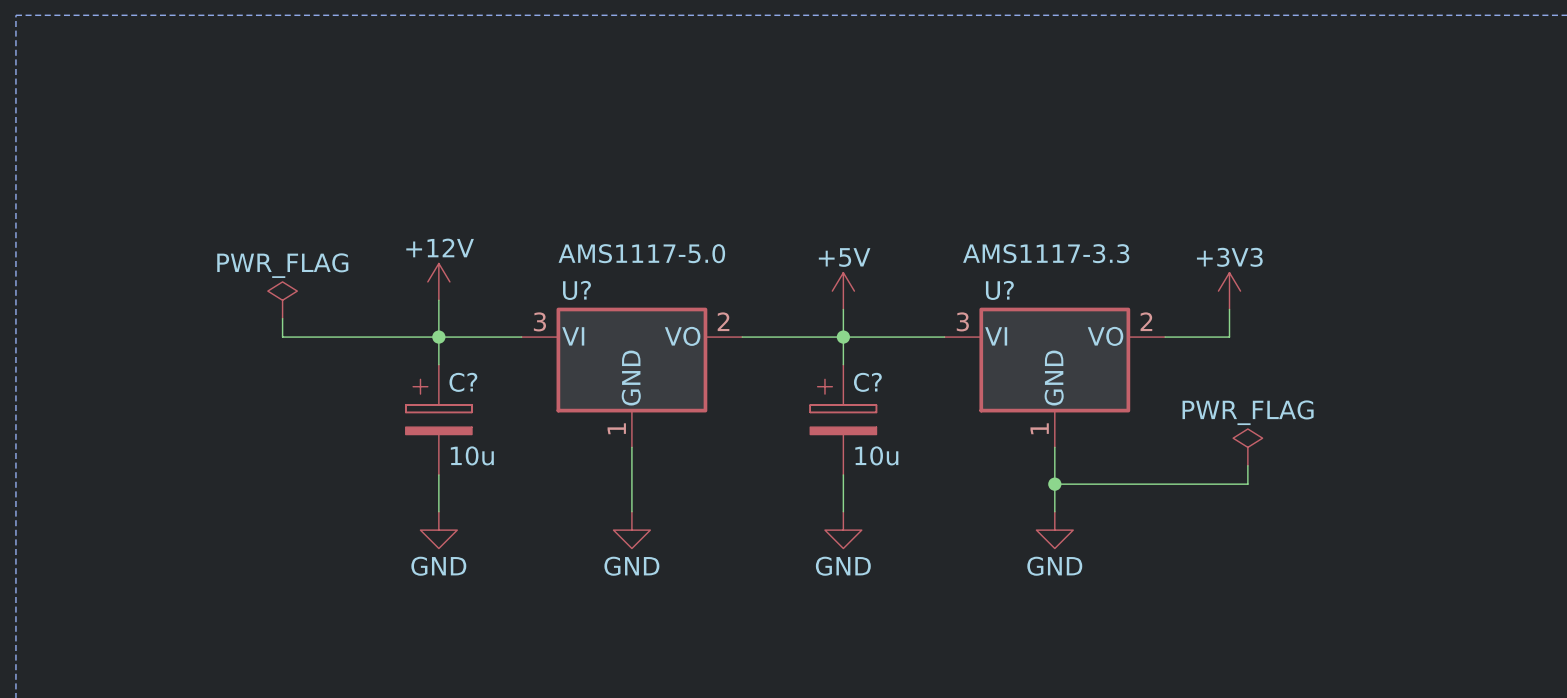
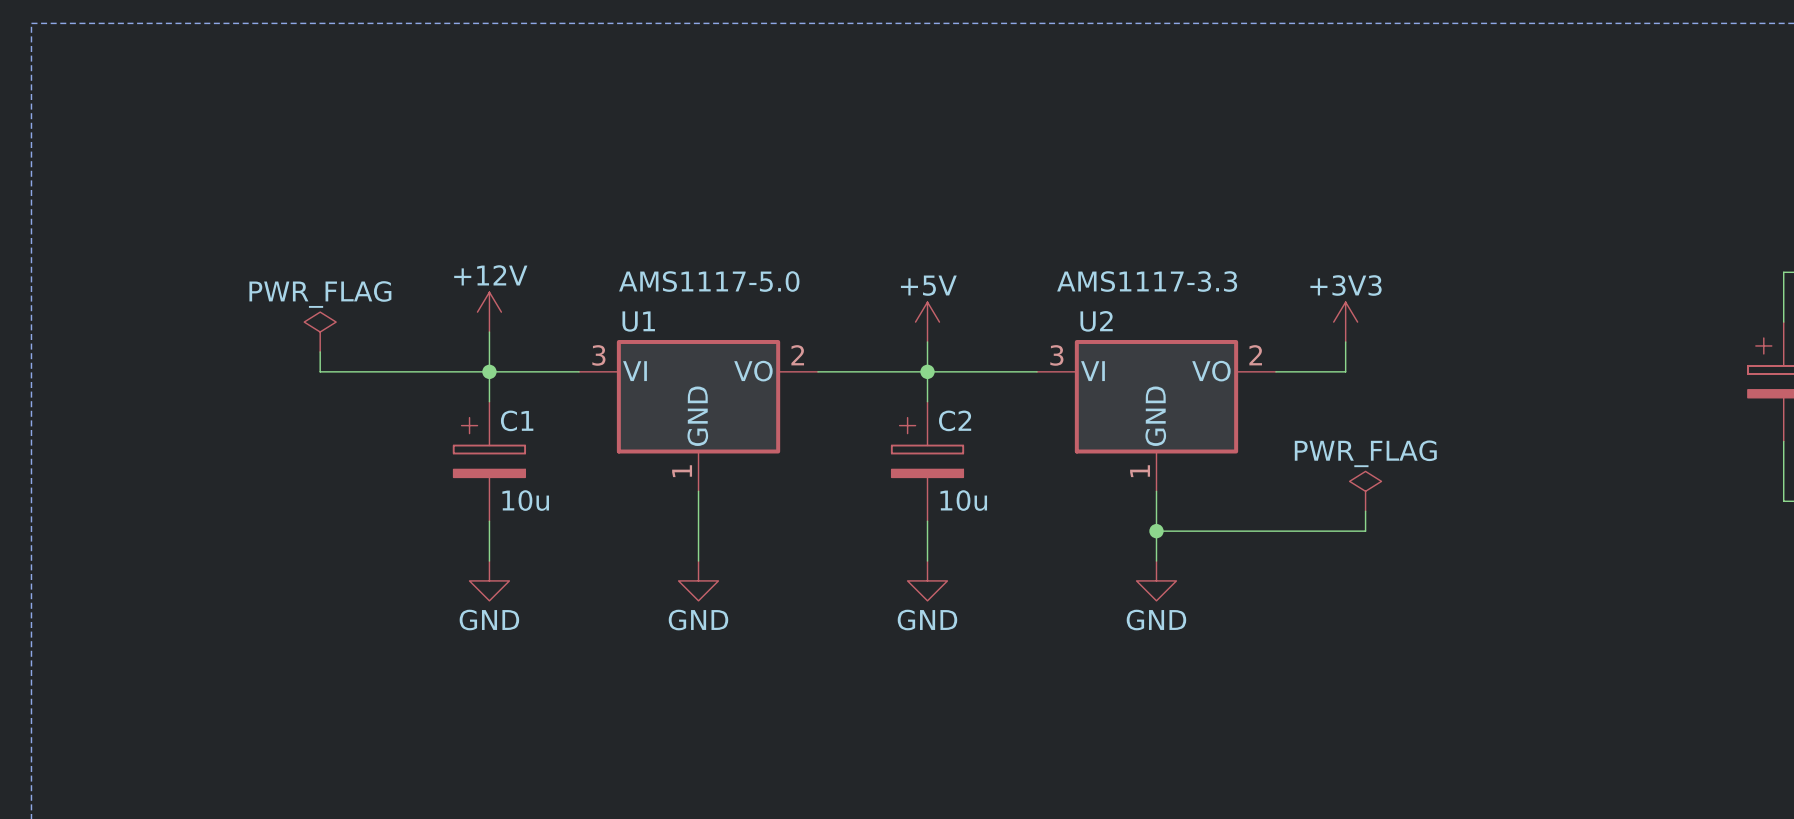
U? name: U? (576, 290) -> U1 (638, 321)
U? name: U? (999, 290) -> U2 (1096, 321)
C? name: C? (463, 382) -> C1 (517, 420)
C? name: C? (867, 382) -> C2 (955, 420)

